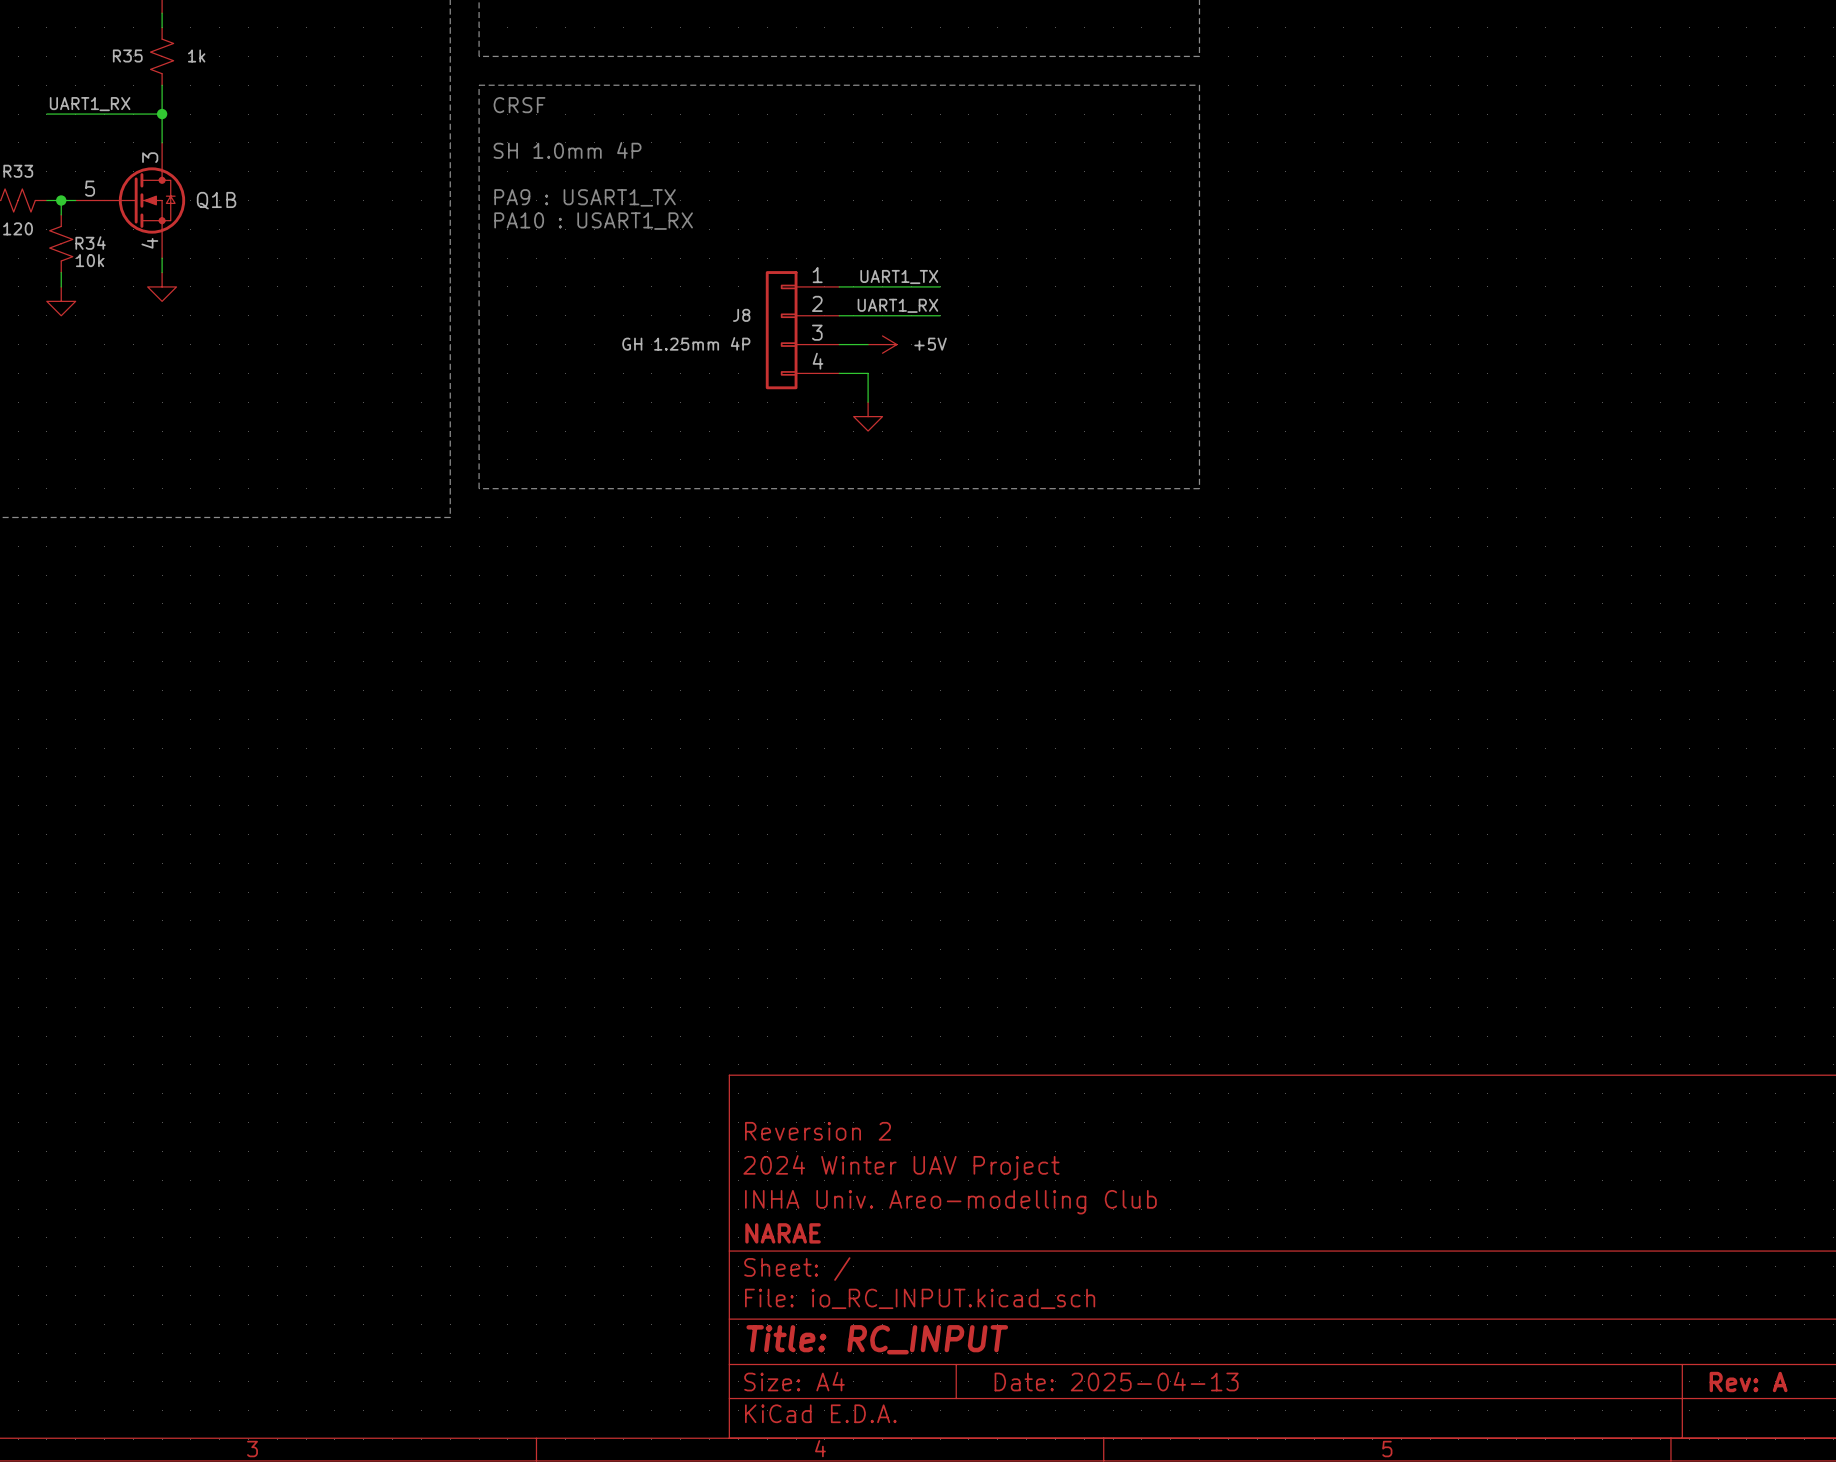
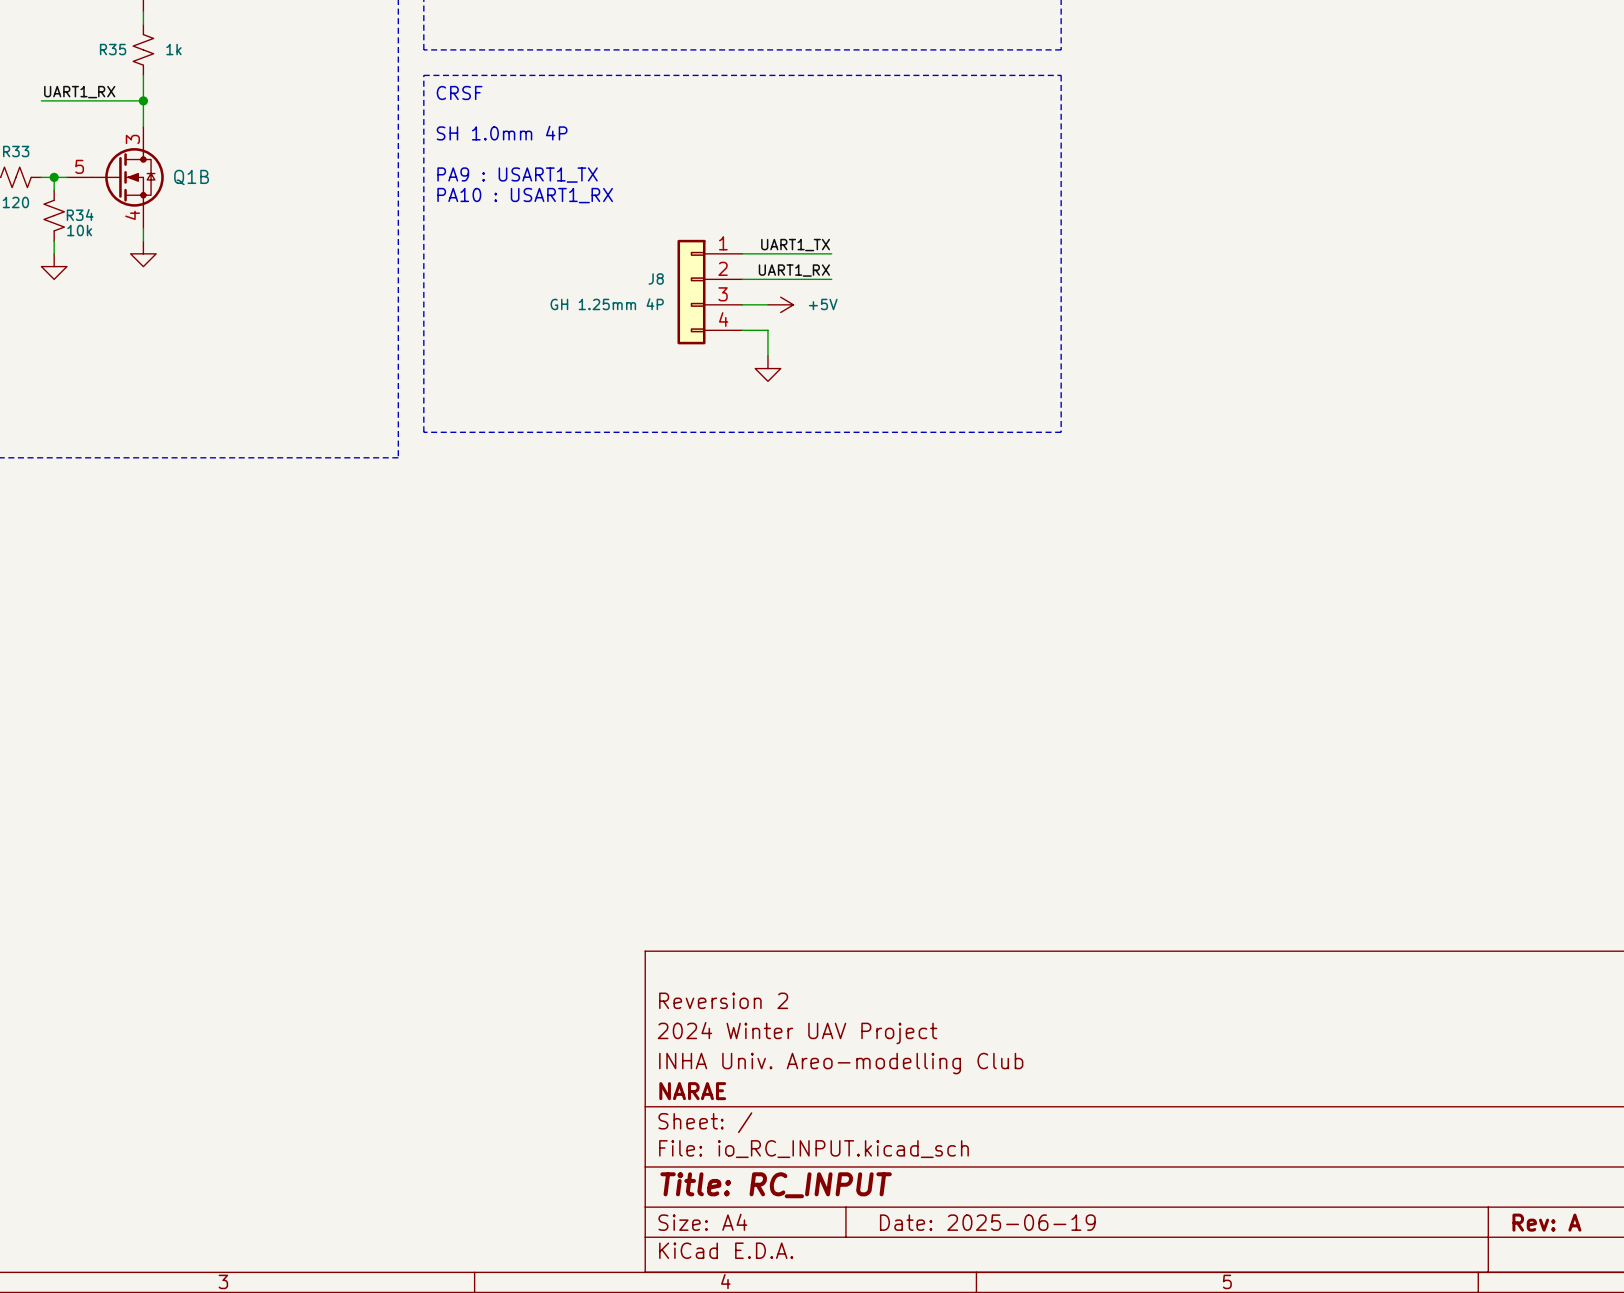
title block: Date: 2025-04-13 (1116, 1381) -> Date: 2025-06-19 (987, 1222)

